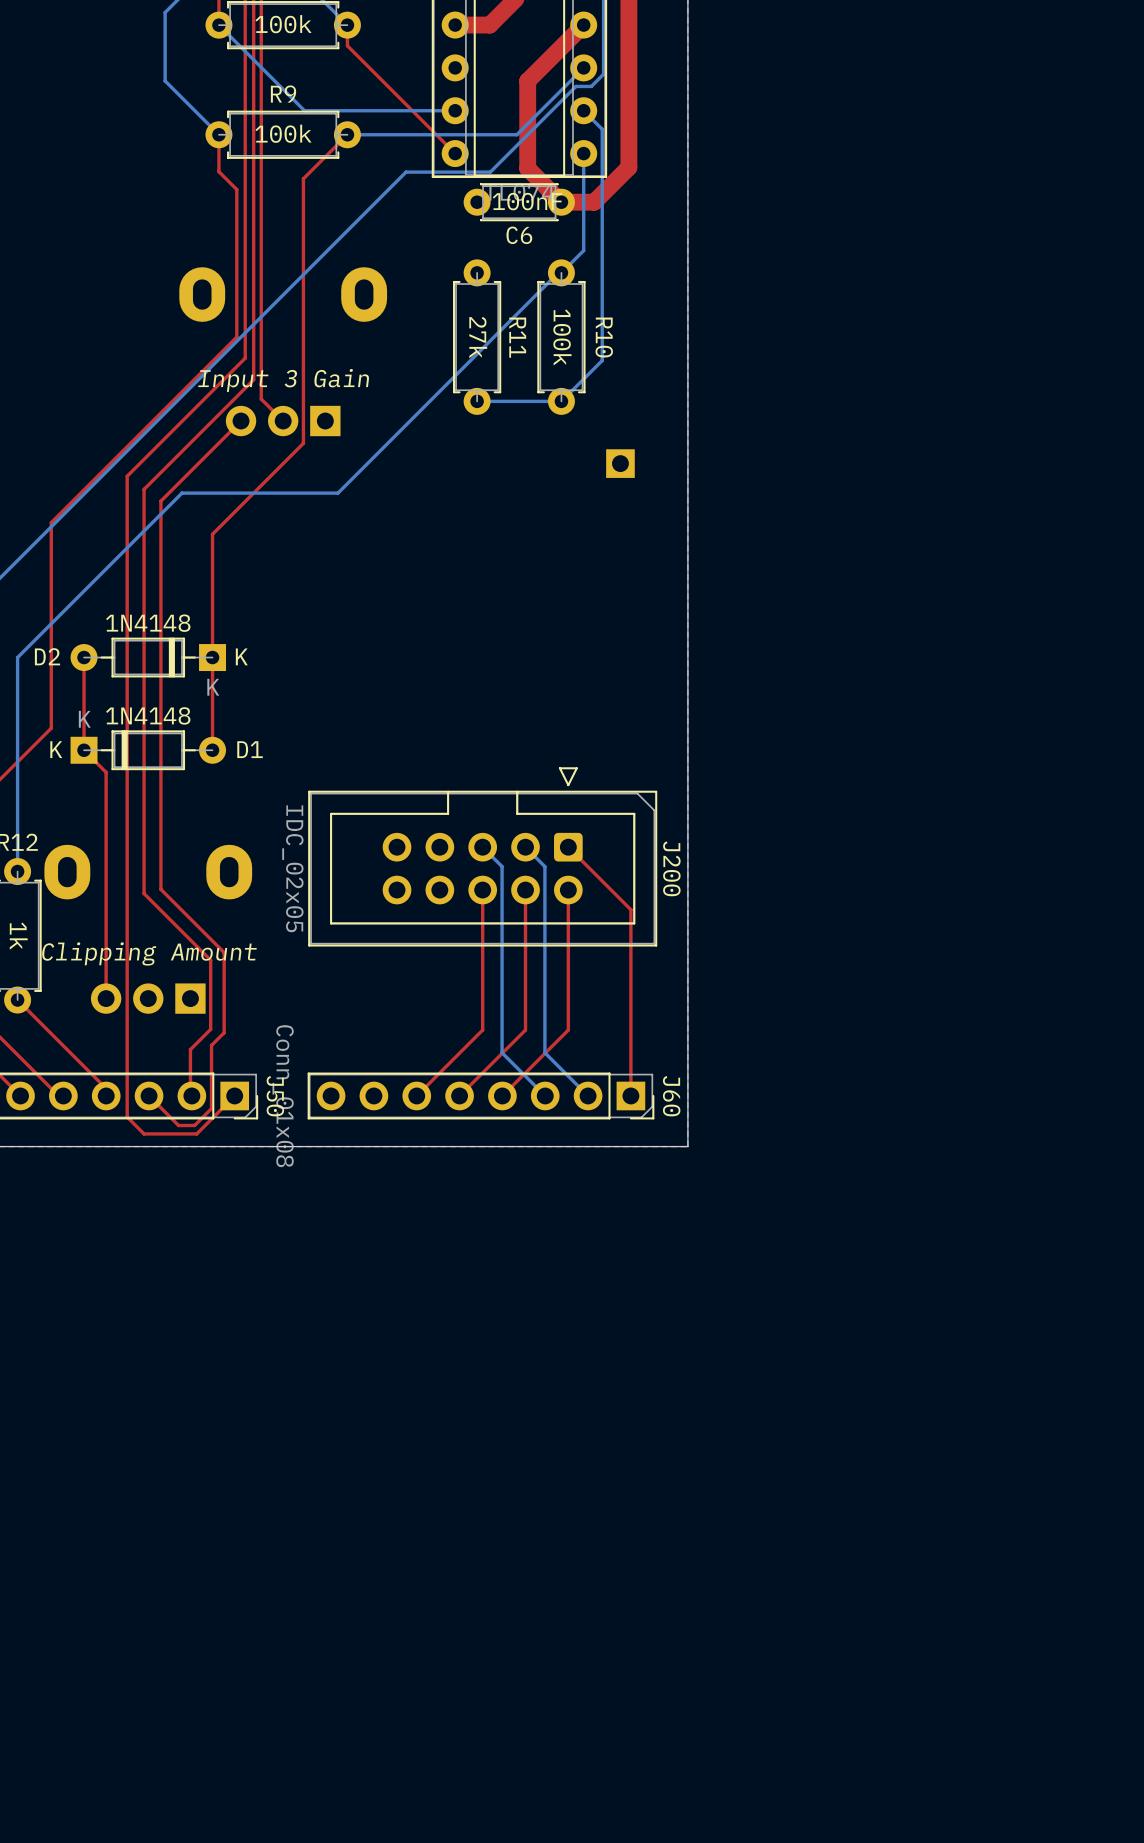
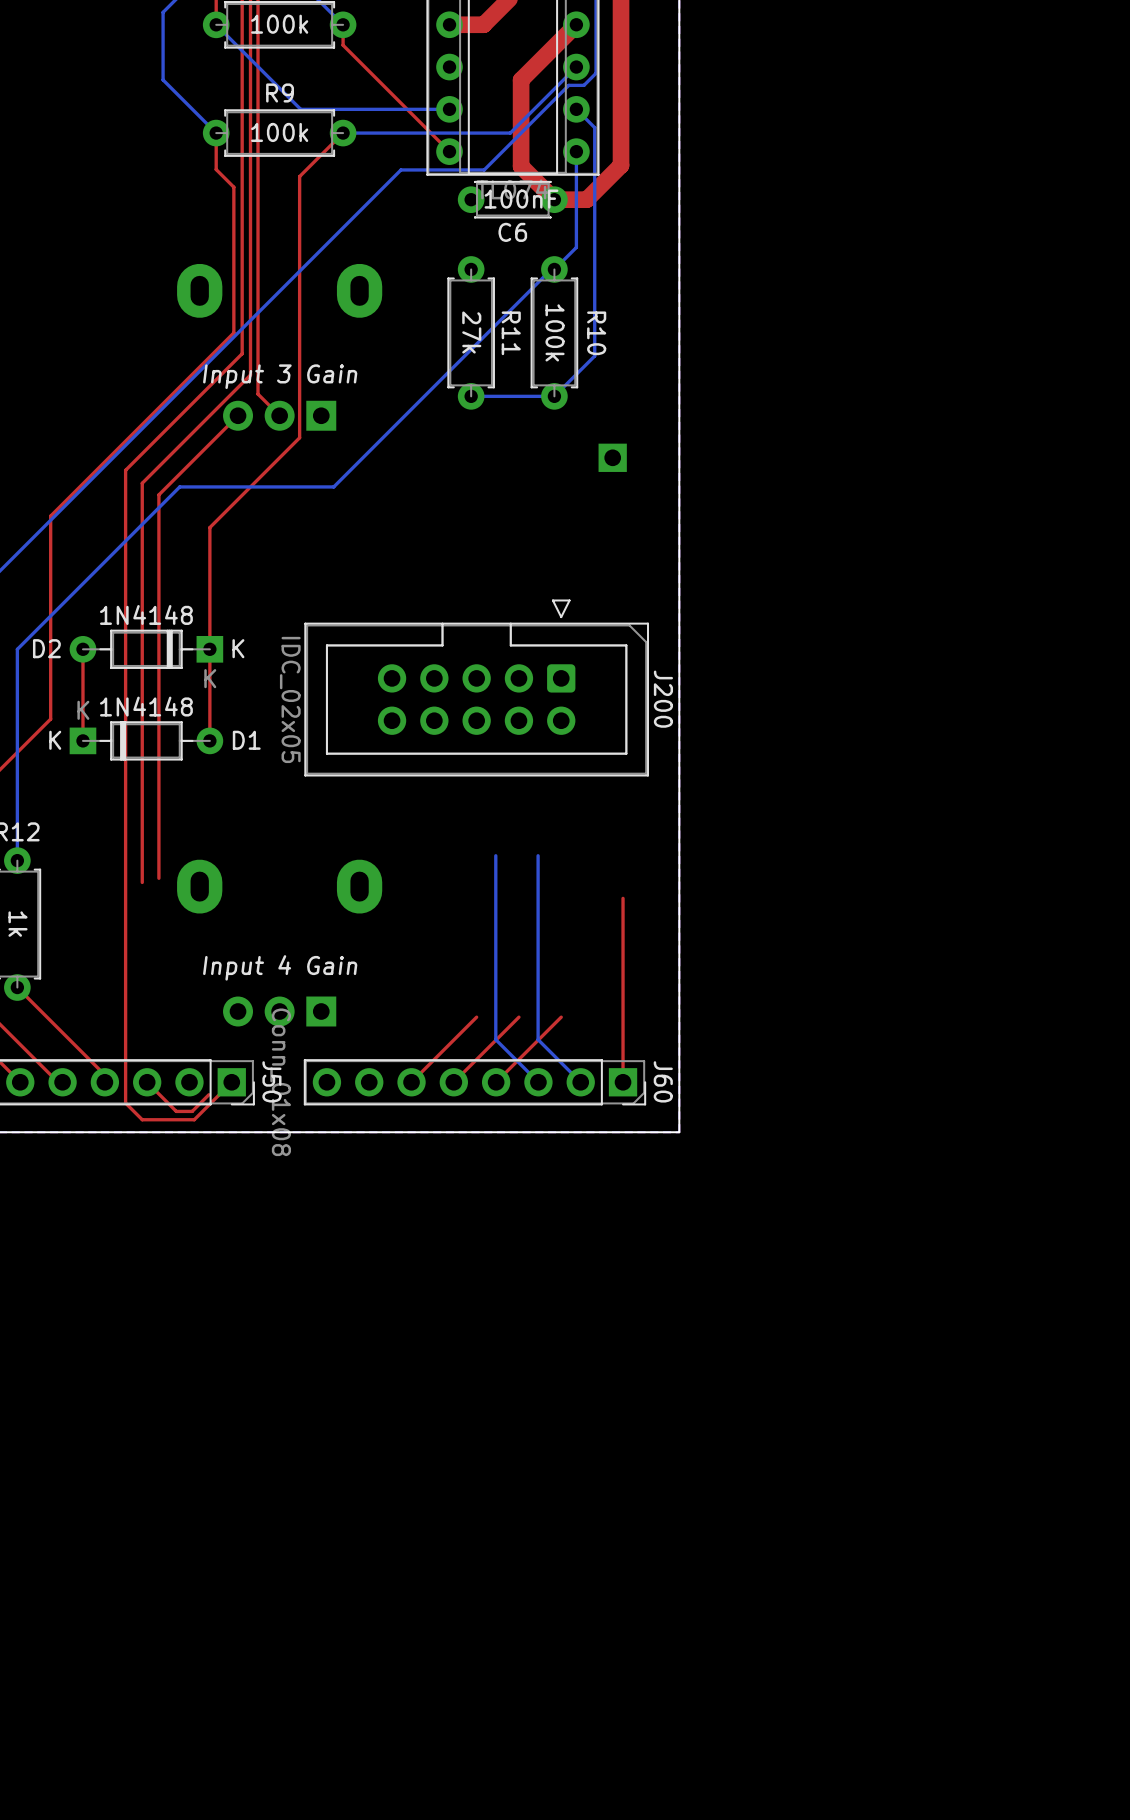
top track: (84, 750) (106, 772) (106, 998) -> none
bottom track: (482, 847) (502, 866) -> none
bottom track: (525, 847) (544, 866) -> none
top track: (568, 847) (630, 909) -> none
J200 position: (482, 856) -> (476, 687)
top track: (160, 889) (224, 952) (224, 1032) (211, 1045) (211, 1108) -> none
top track: (482, 890) (482, 1030) -> none
top track: (525, 890) (525, 1030) -> none
top track: (568, 890) (568, 1030) -> none
top track: (144, 893) (210, 960) (210, 1029) (190, 1049) (190, 1094) -> none
part: (148, 929) -> none
part: none -> (279, 943)

